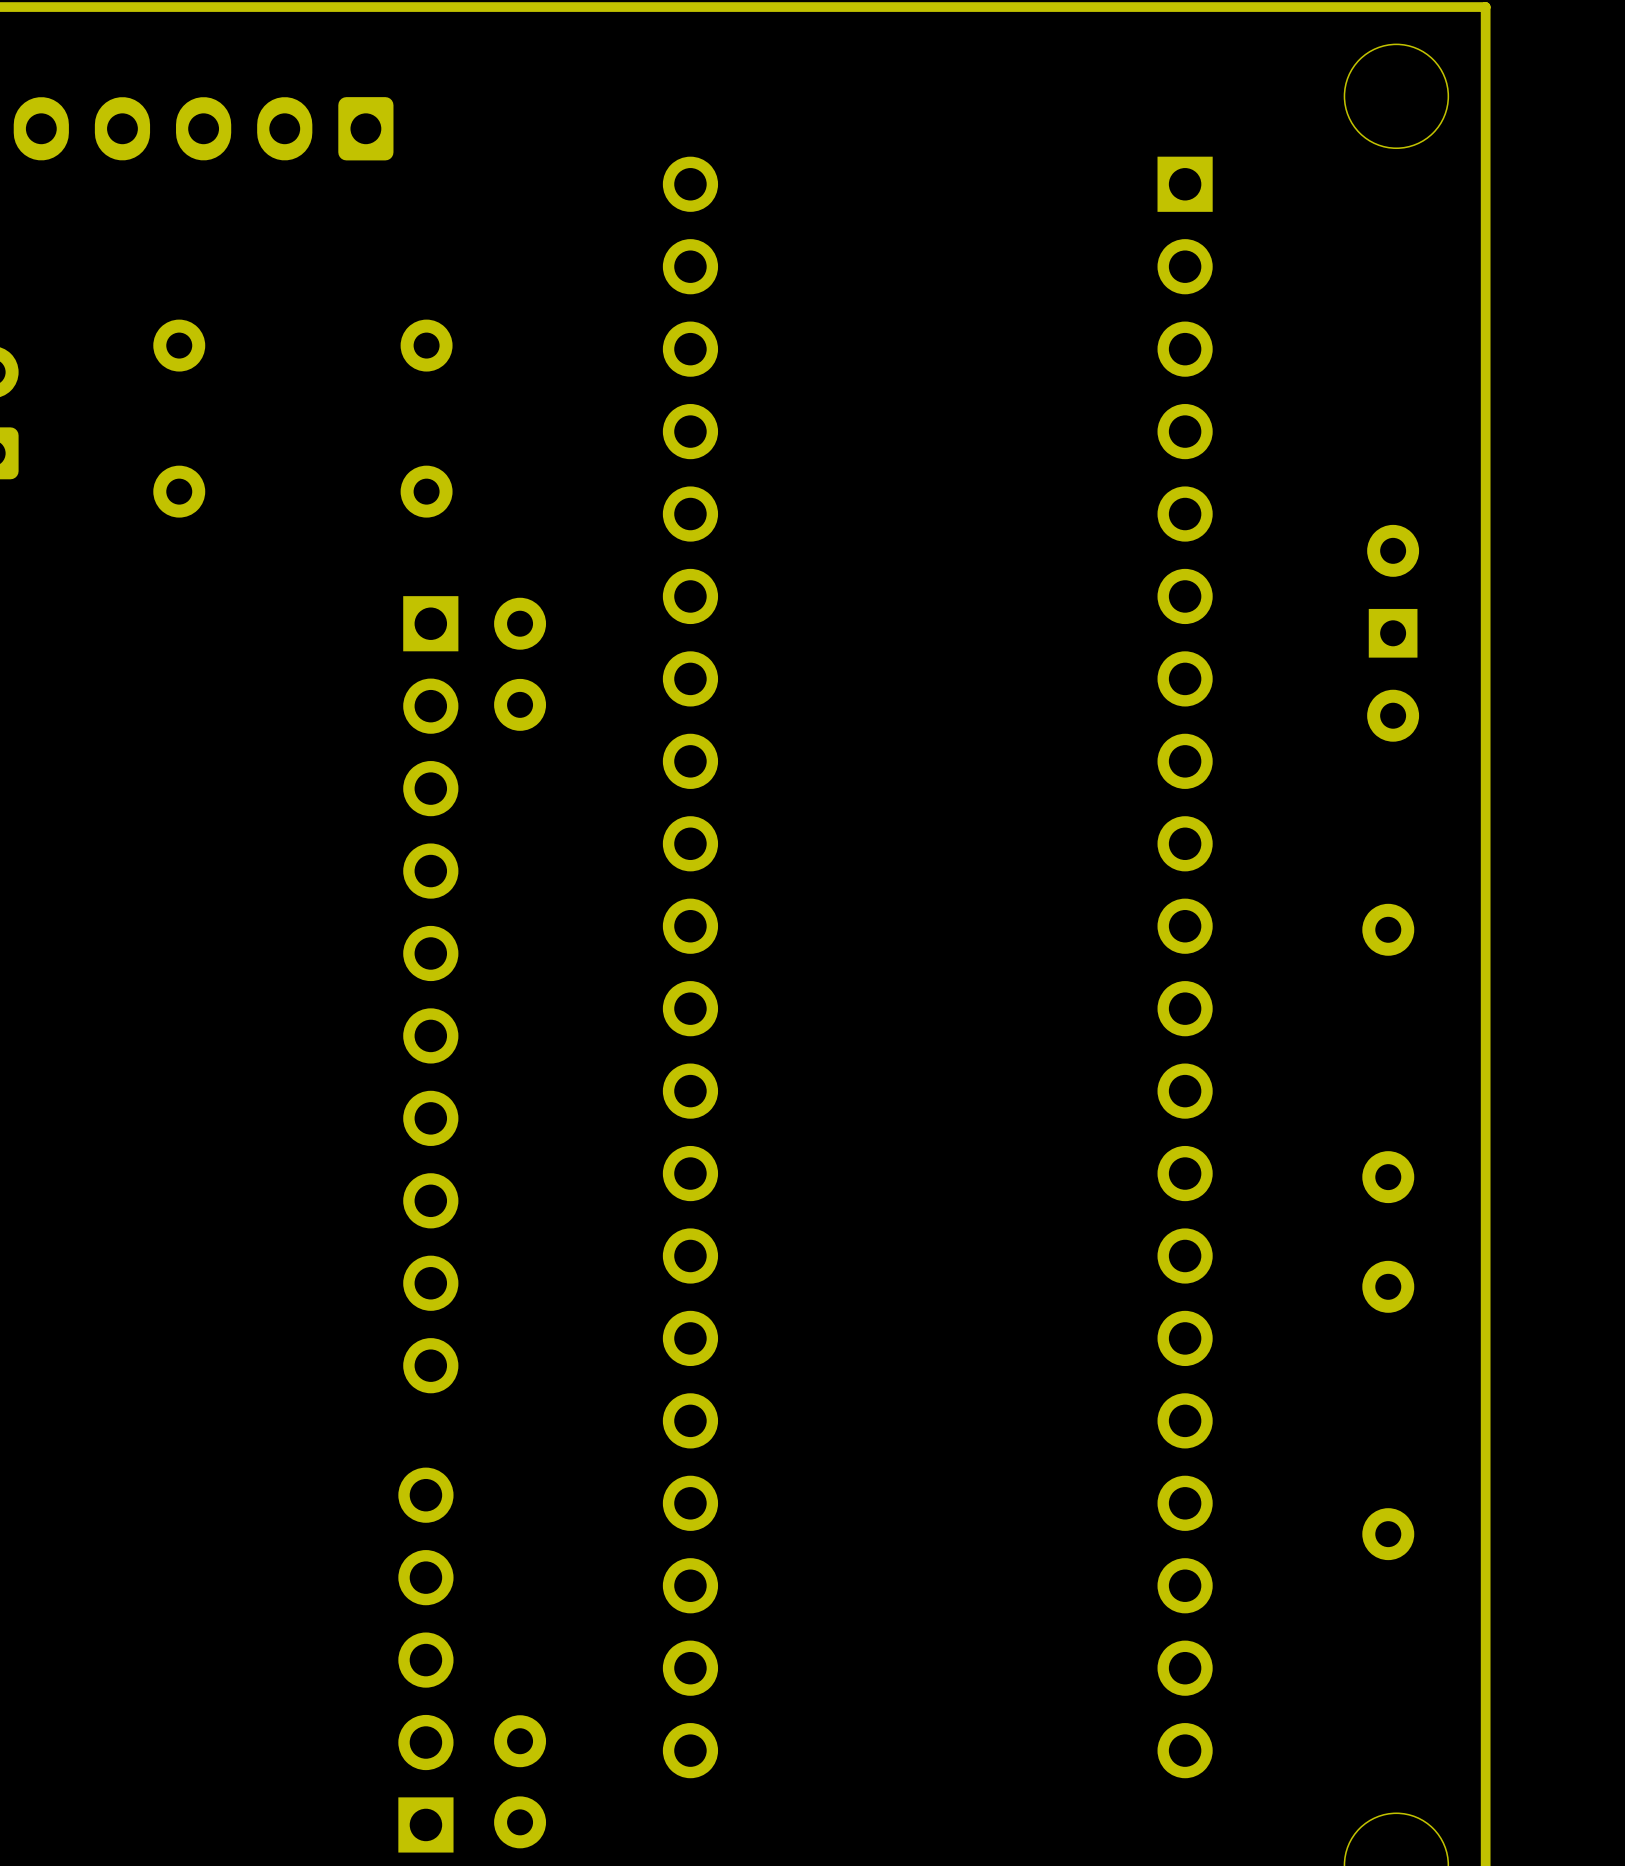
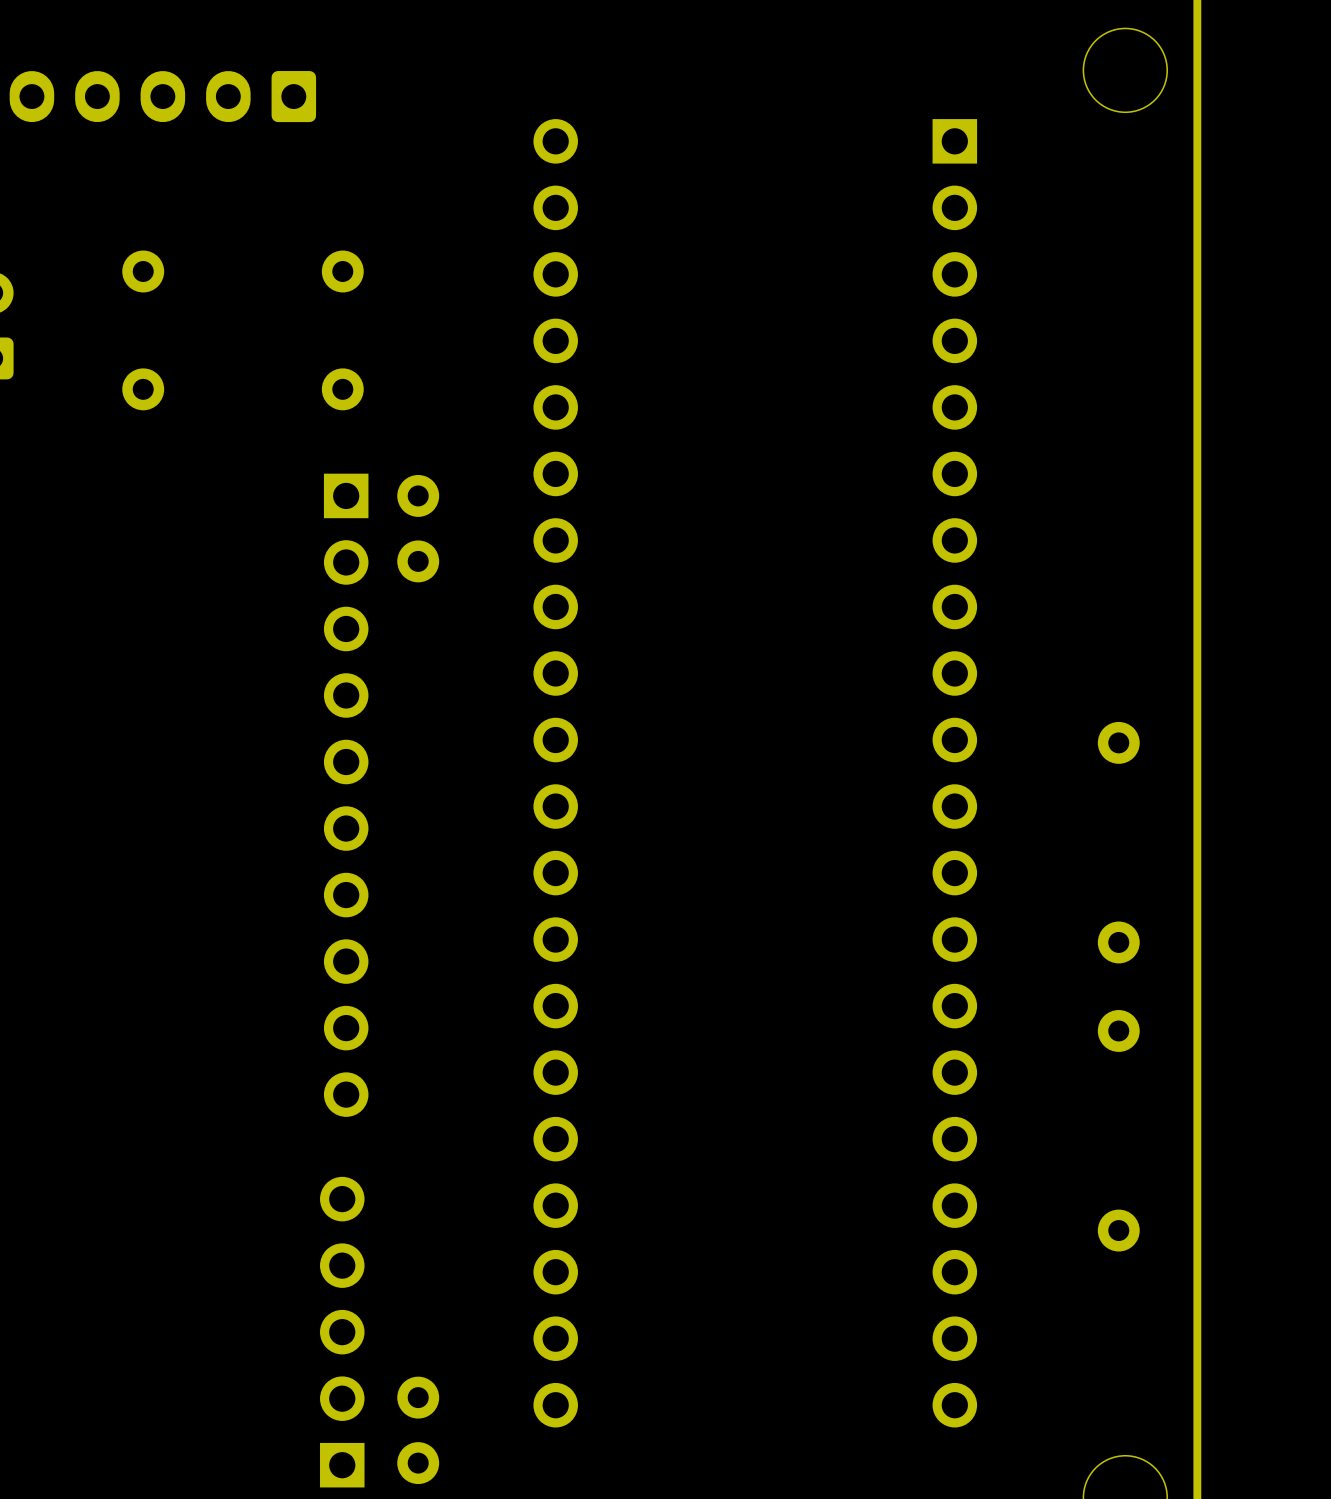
part: (1393, 633) -> none

